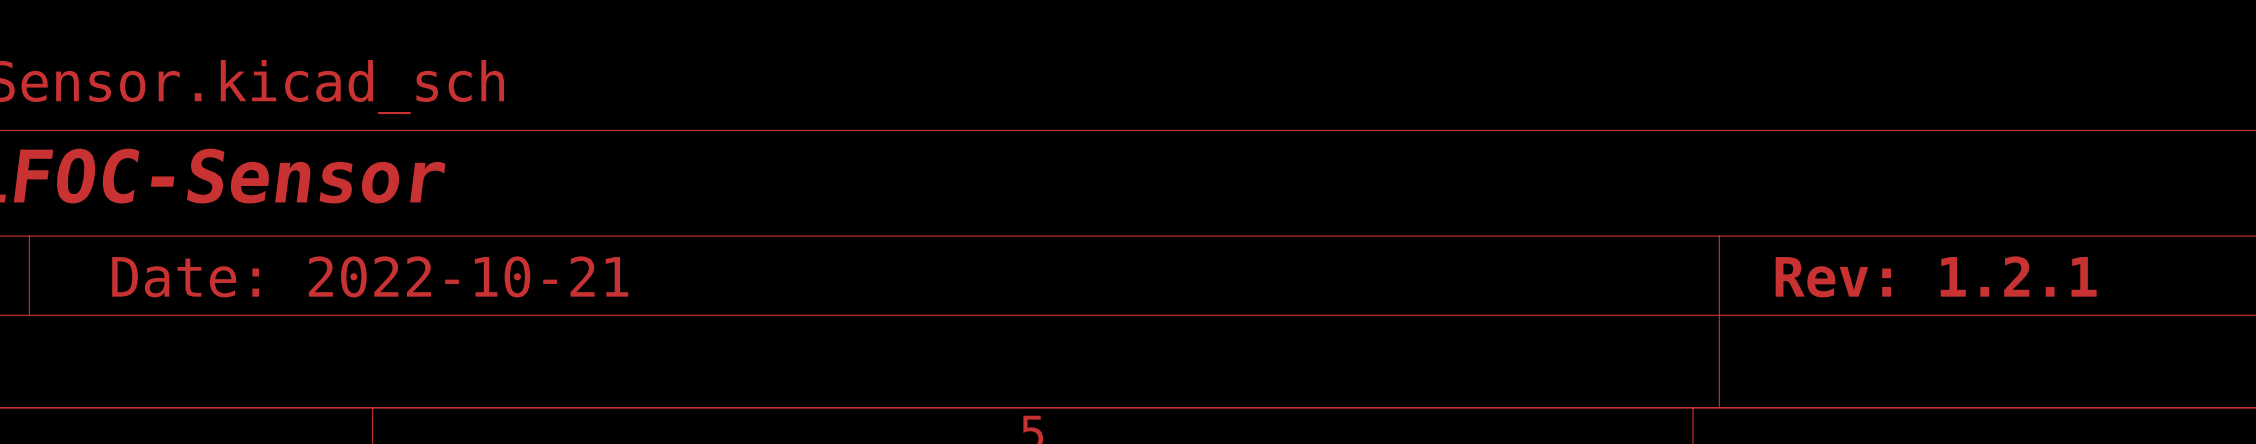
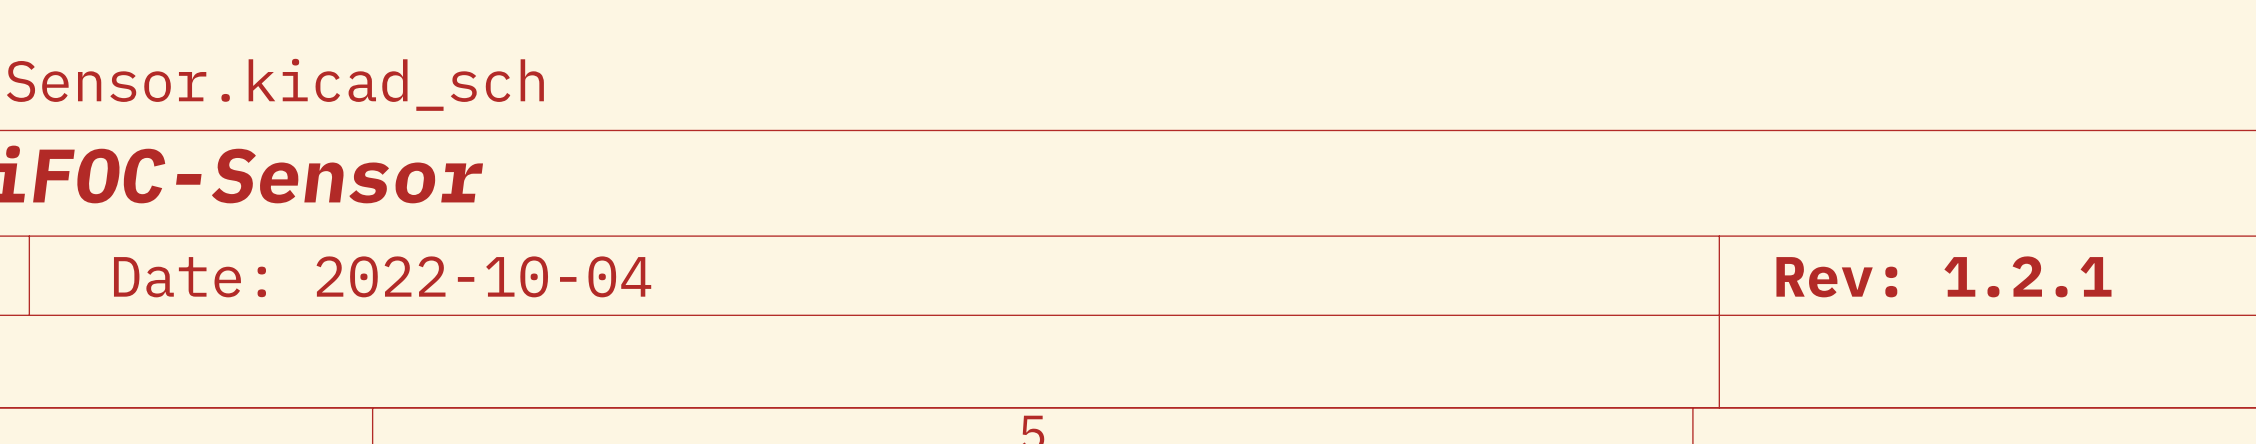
title block: Date: 2022-10-21 (370, 276) -> Date: 2022-10-04 (382, 276)

